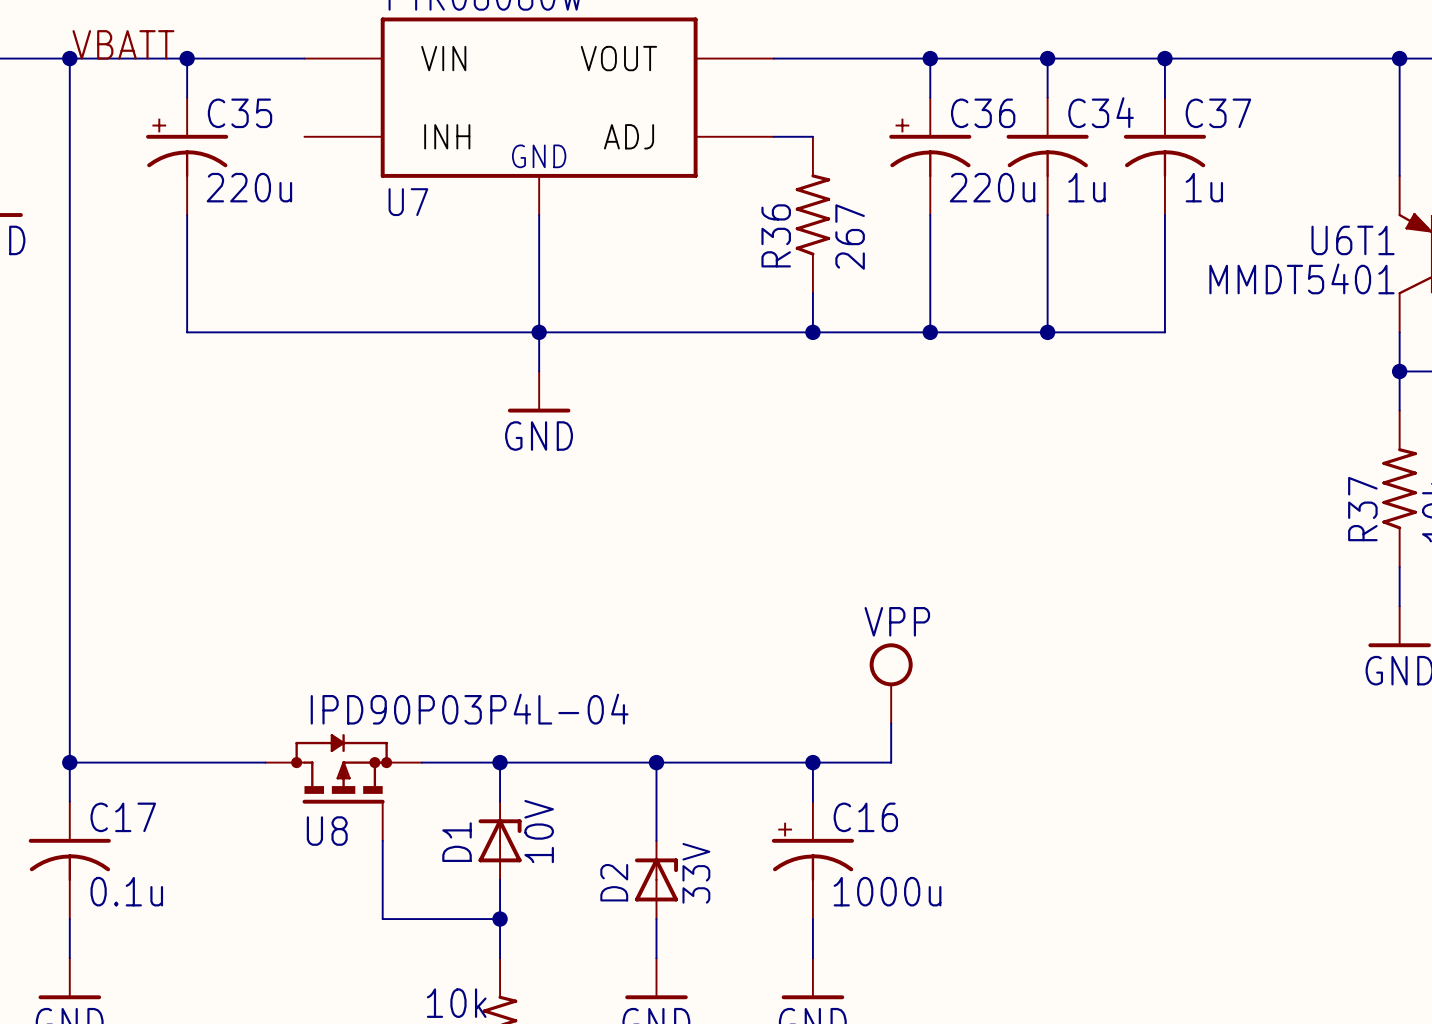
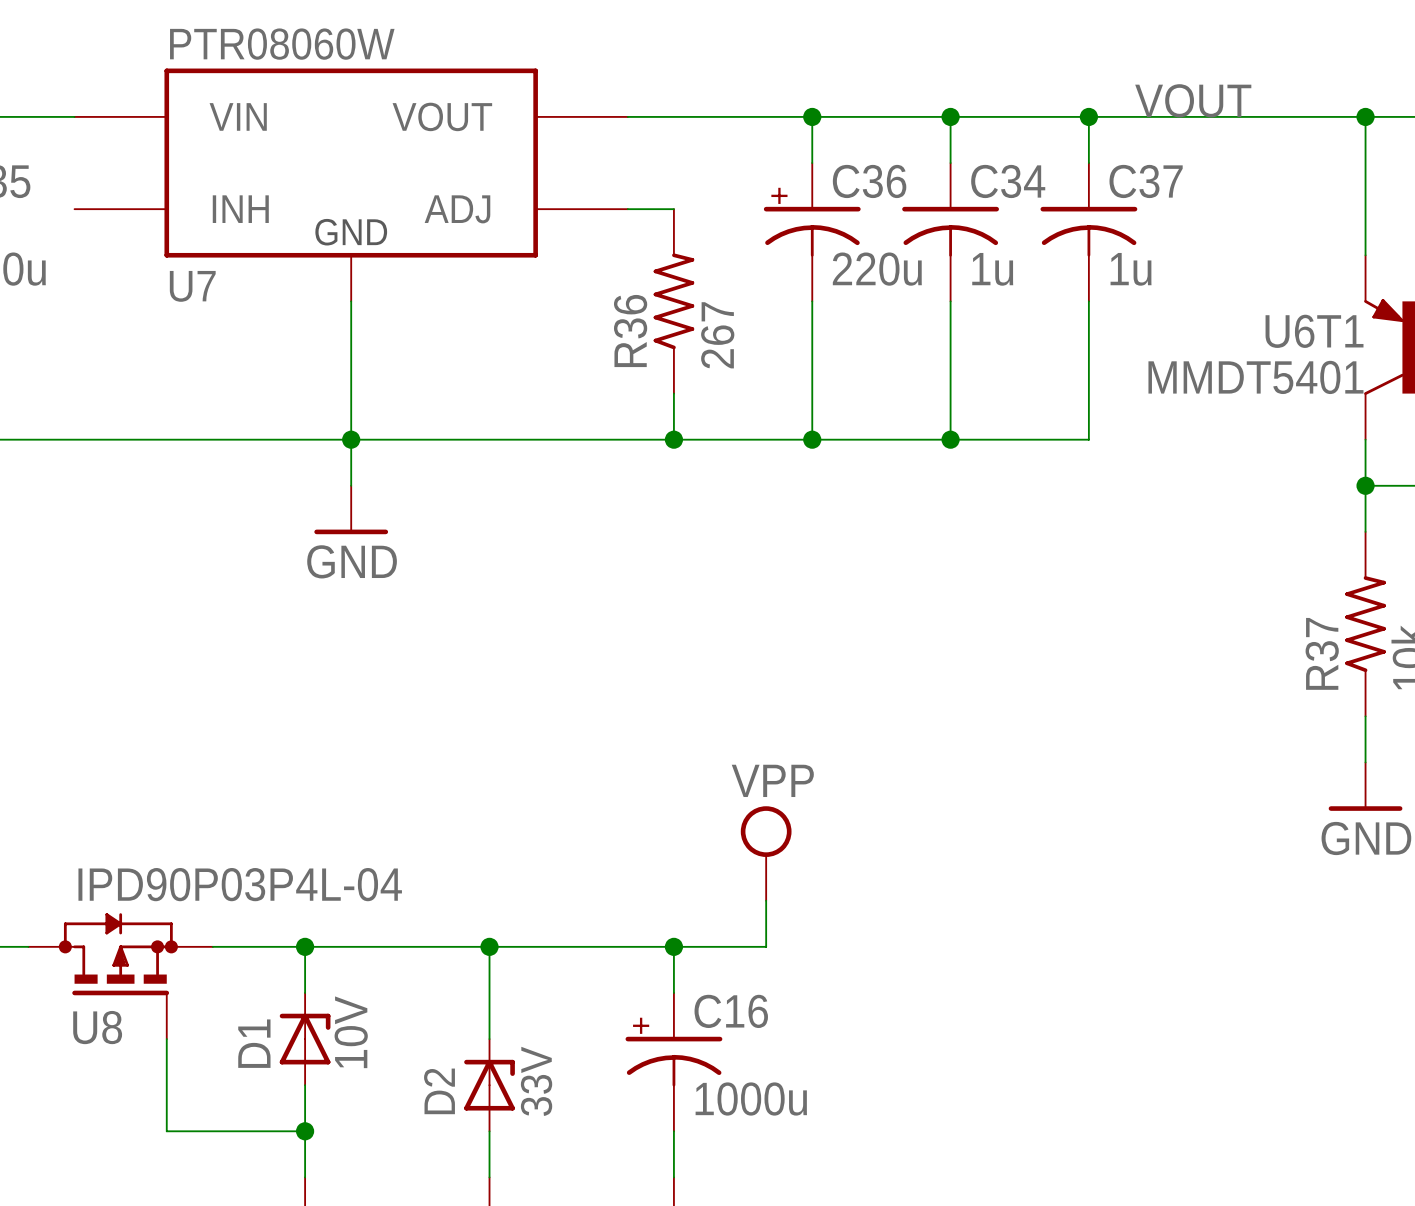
label: none -> VOUT (1193, 100)

